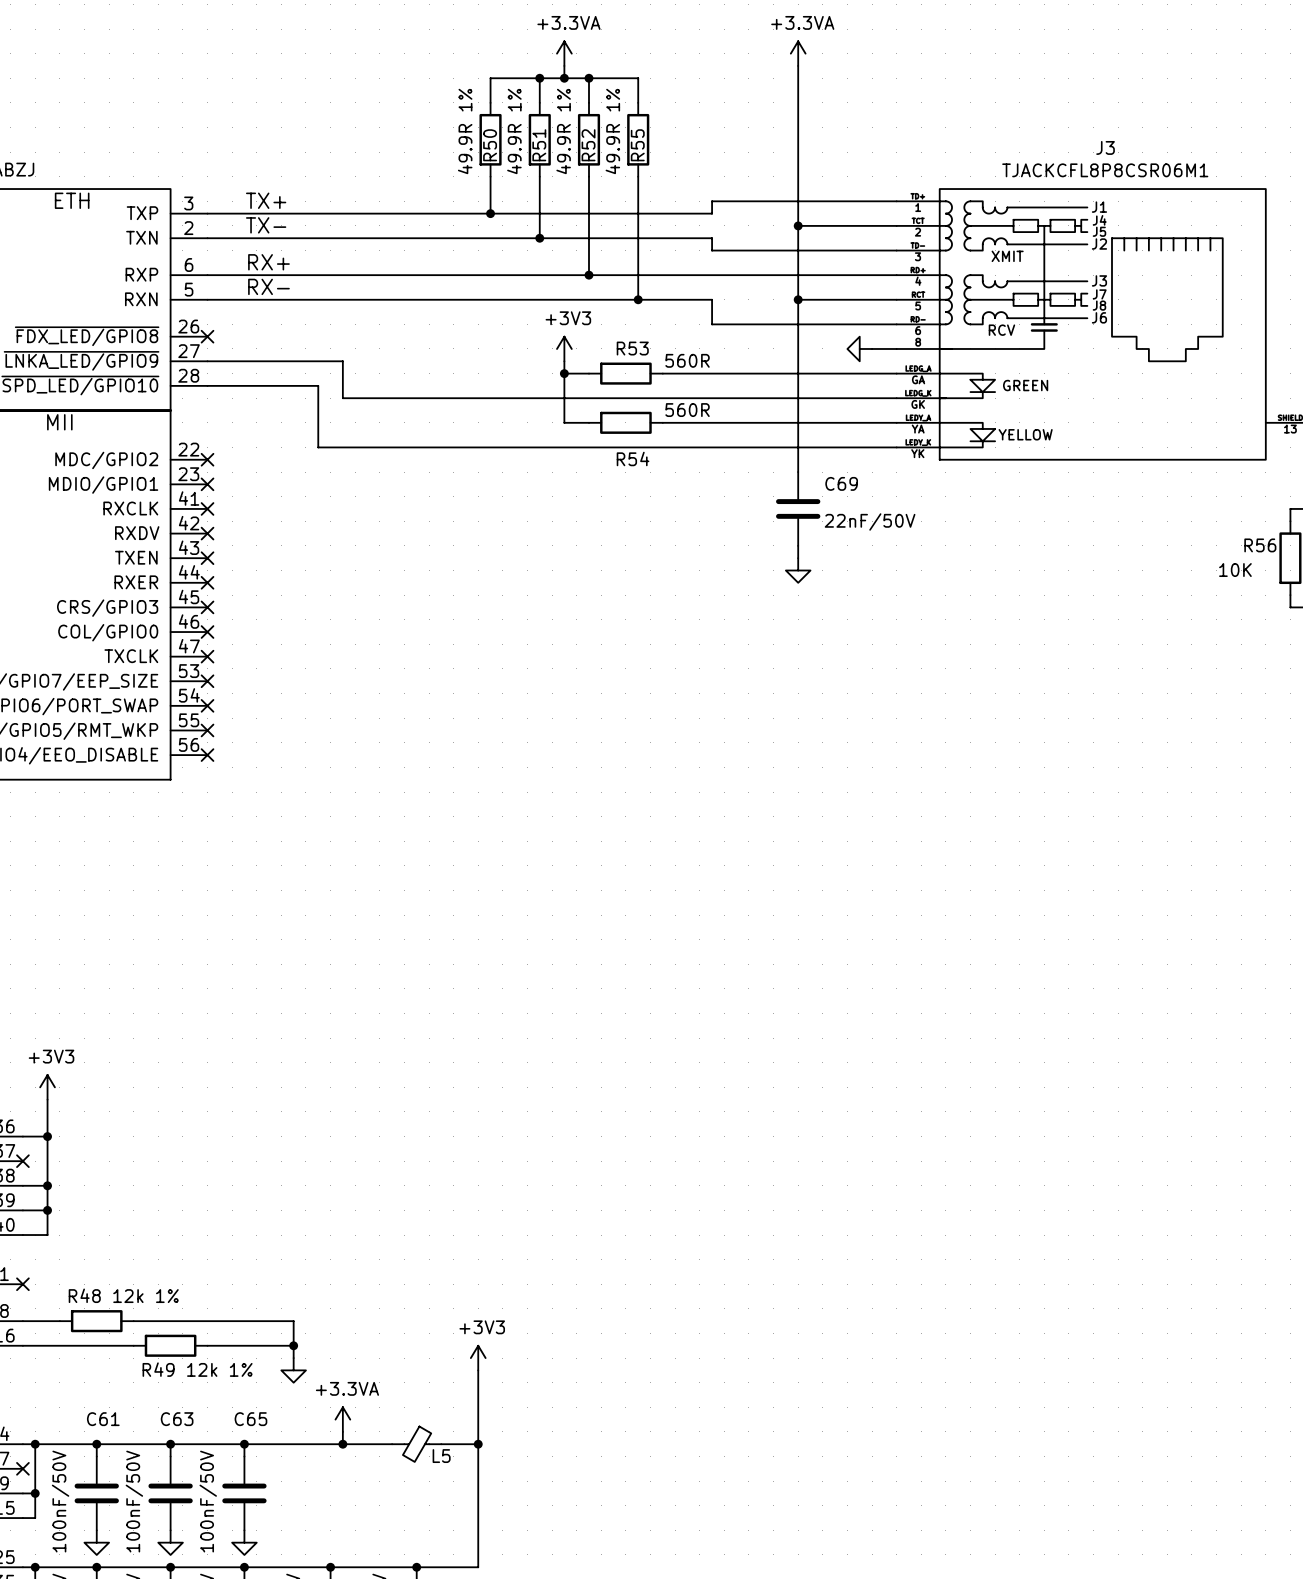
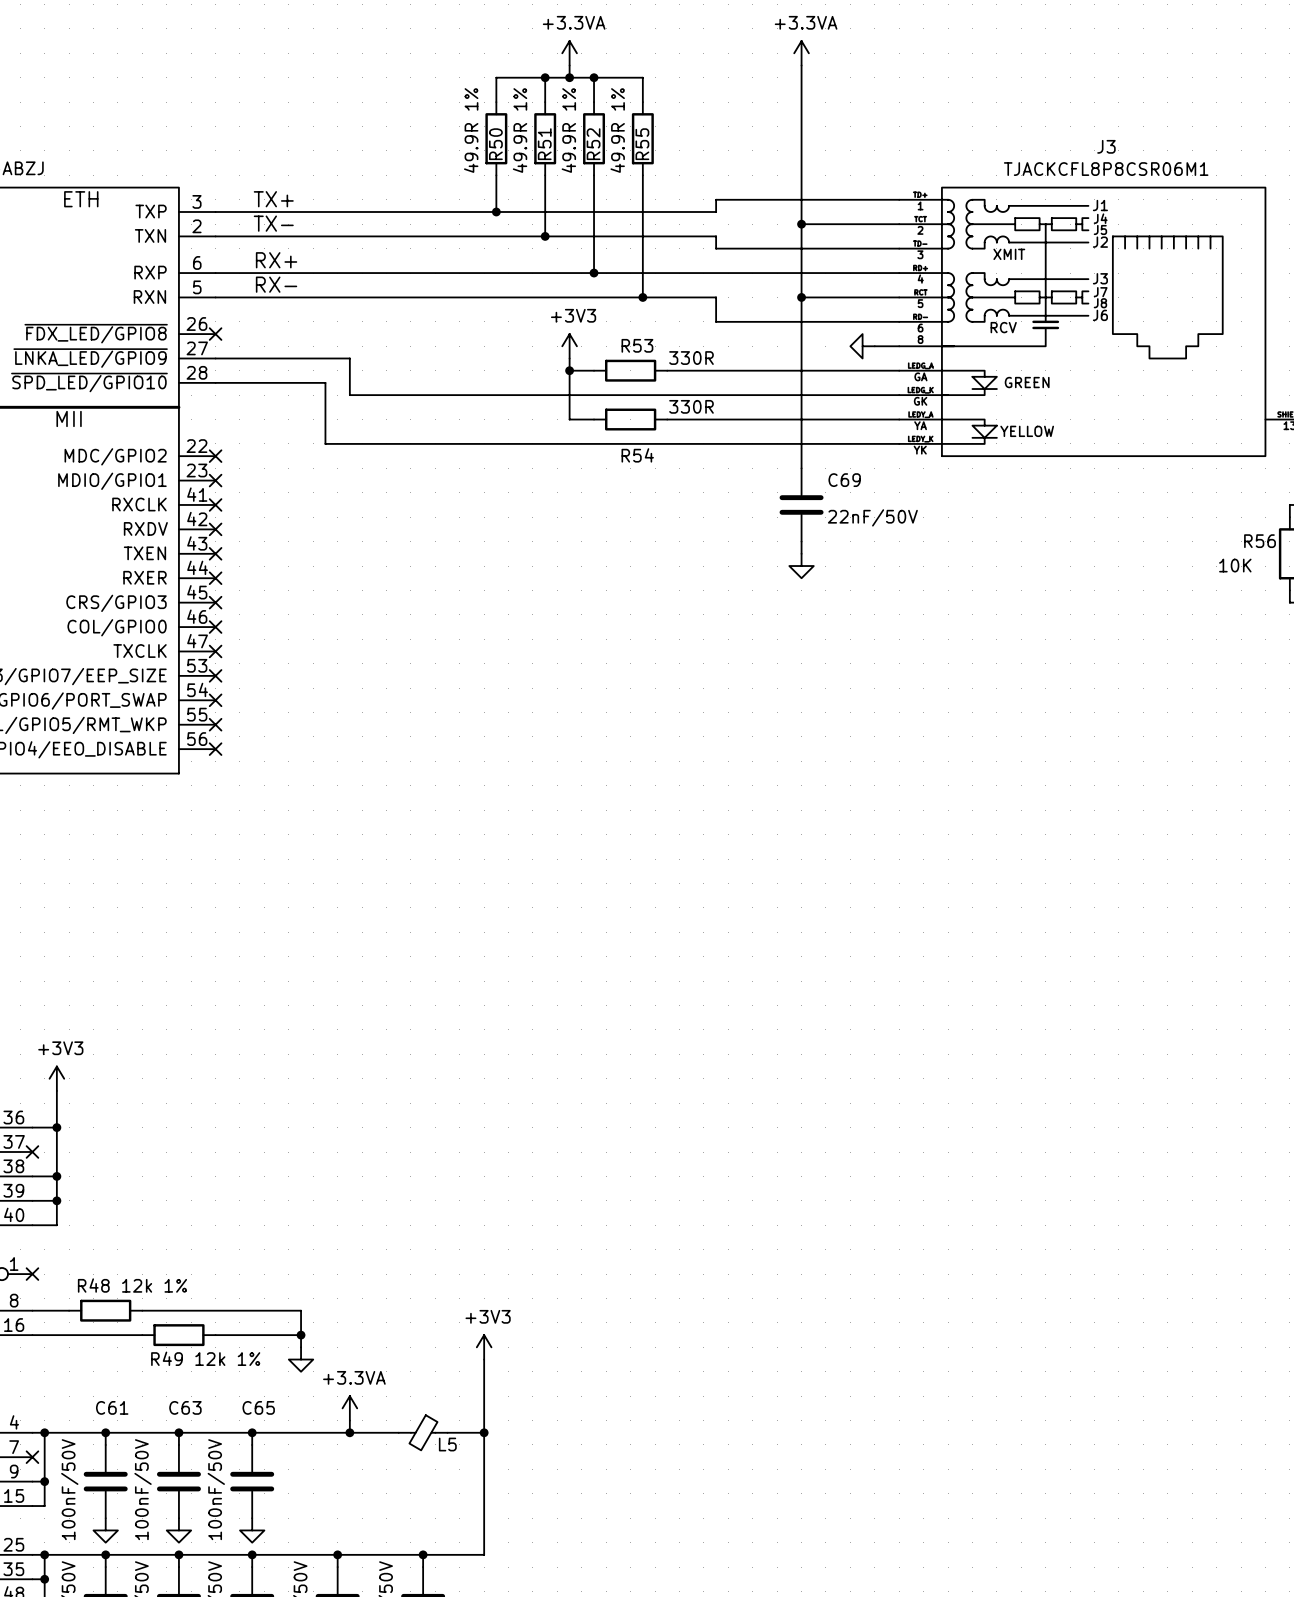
R53 value: 560R (687, 360) -> 330R (691, 358)
R54 value: 560R (687, 410) -> 330R (691, 406)

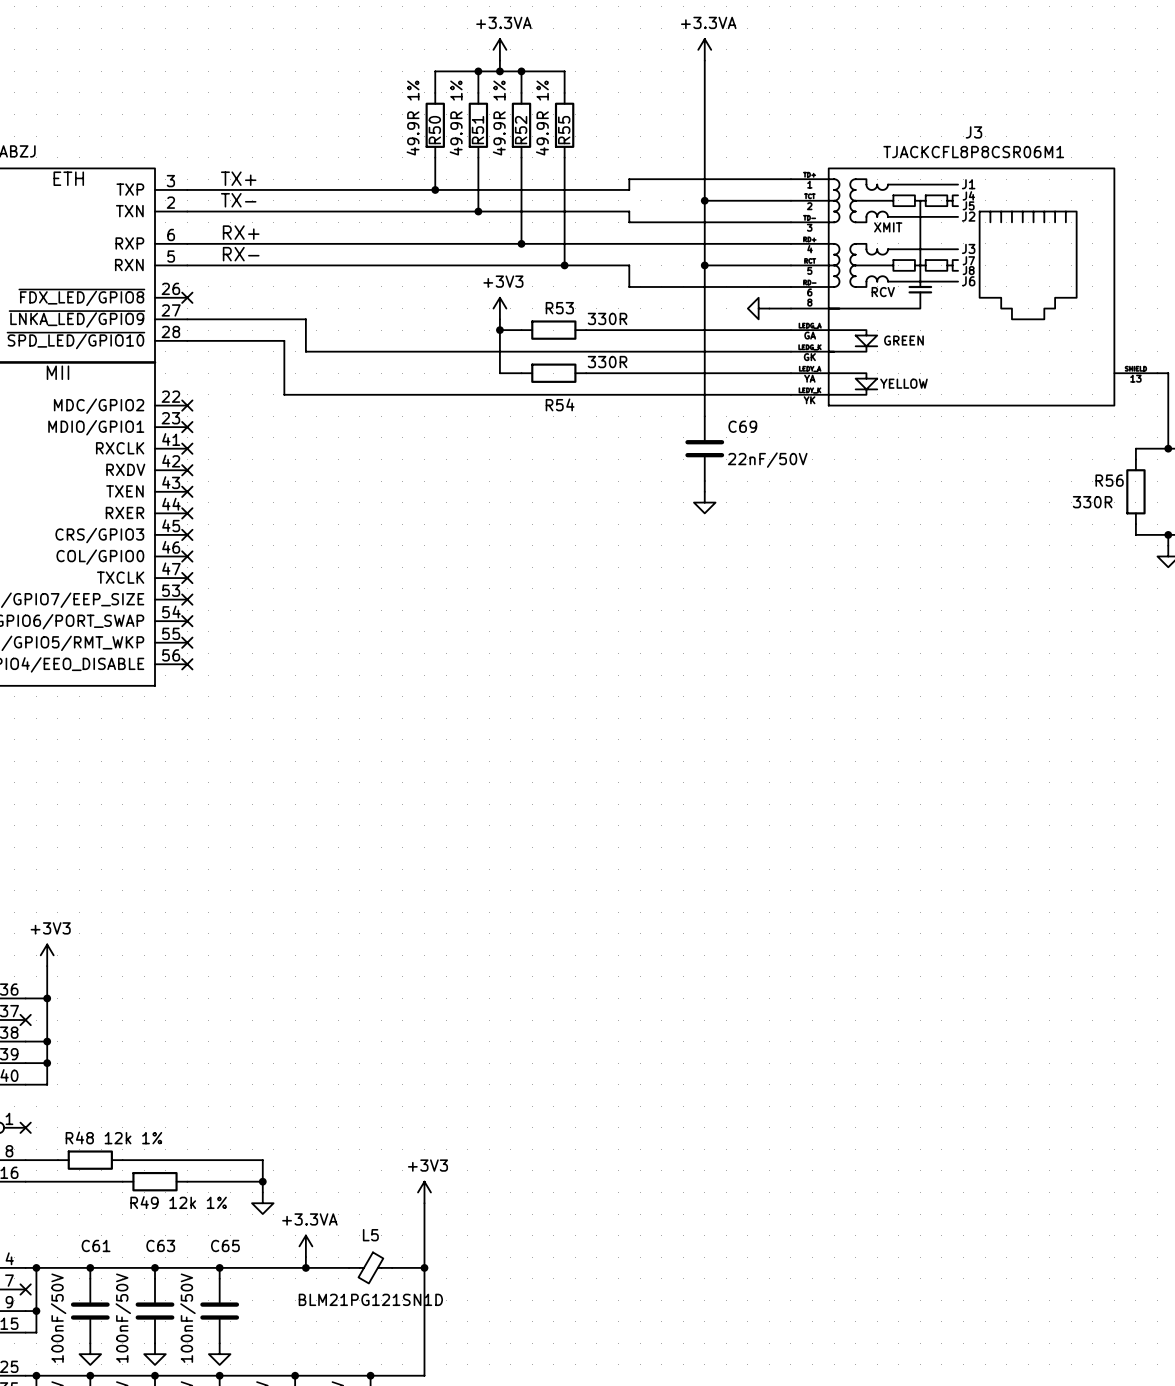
R56 value: 10K (1235, 565) -> 330R (1092, 502)
L5 name position: L5 (447, 1444) -> L5 (370, 1235)
L5 value: none -> BLM21PG121SN1D (370, 1299)

